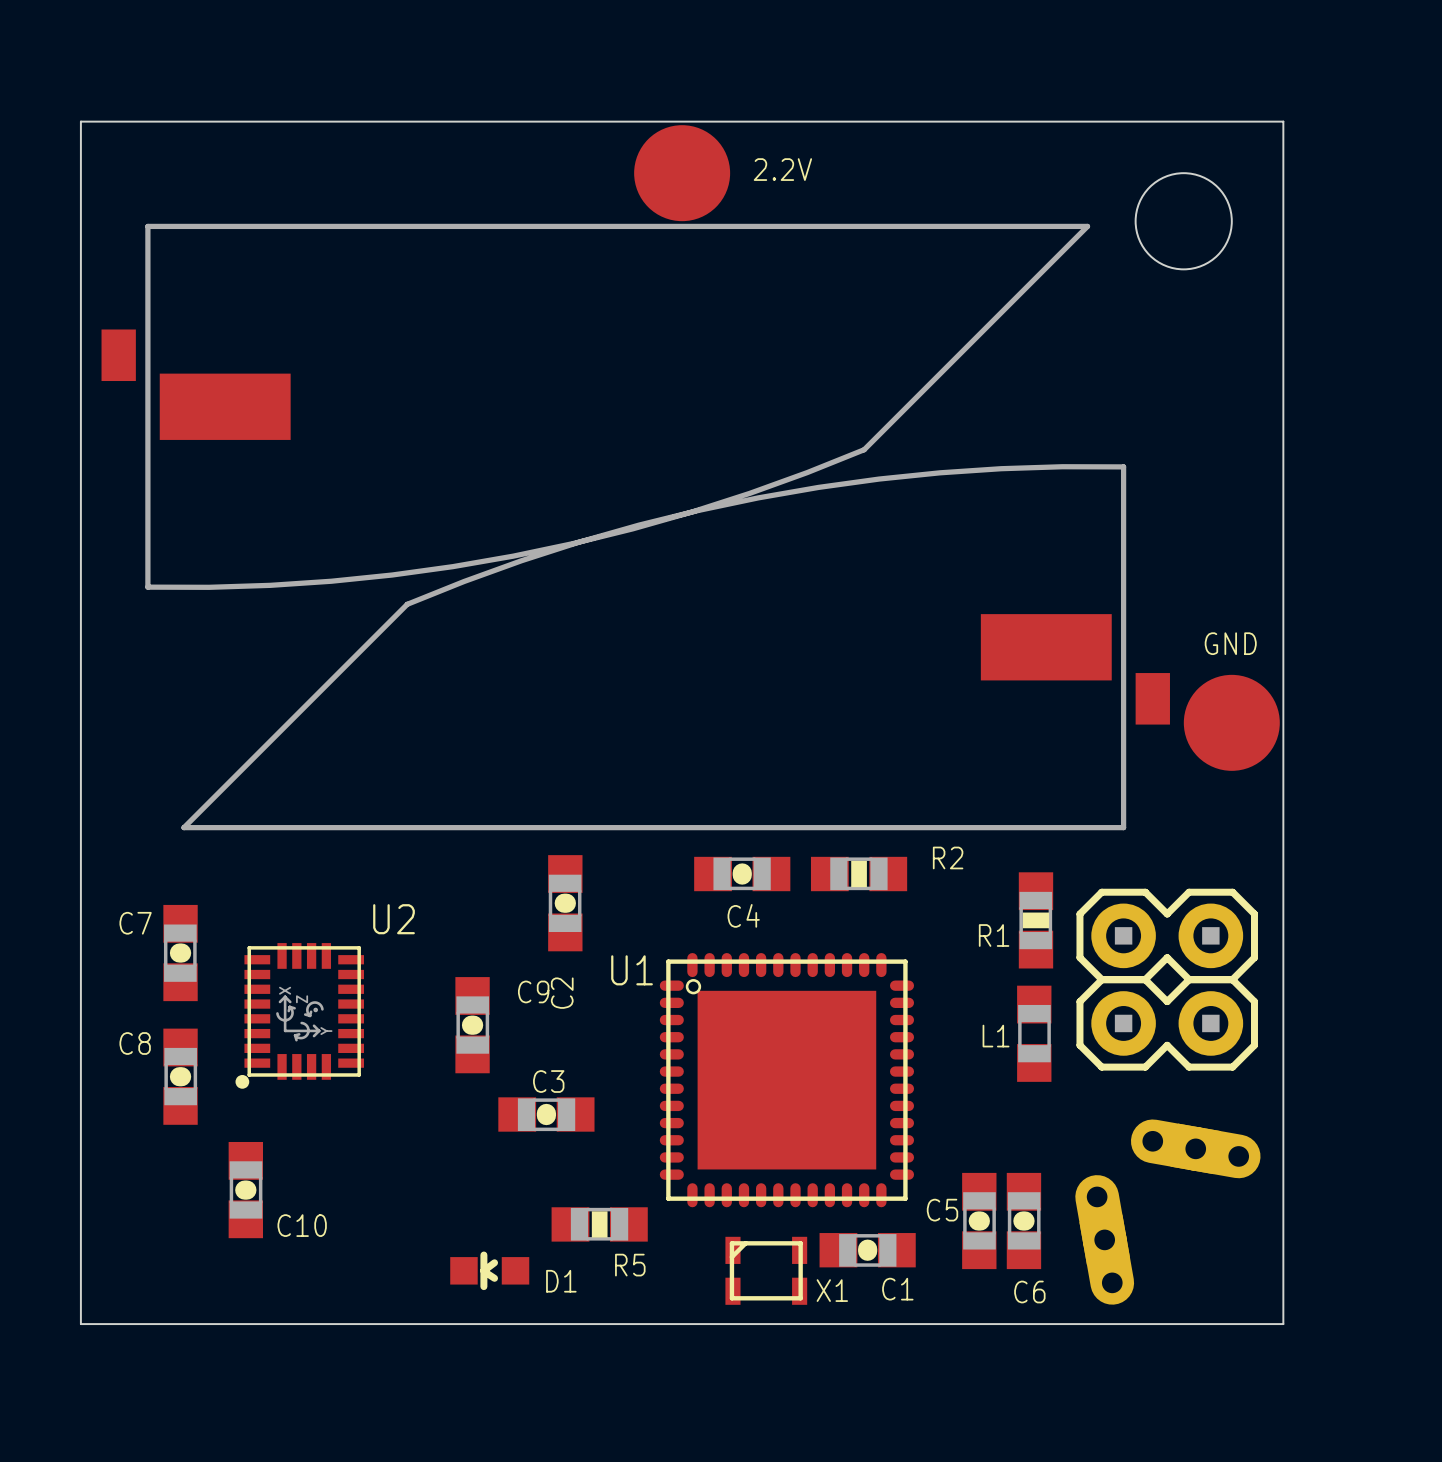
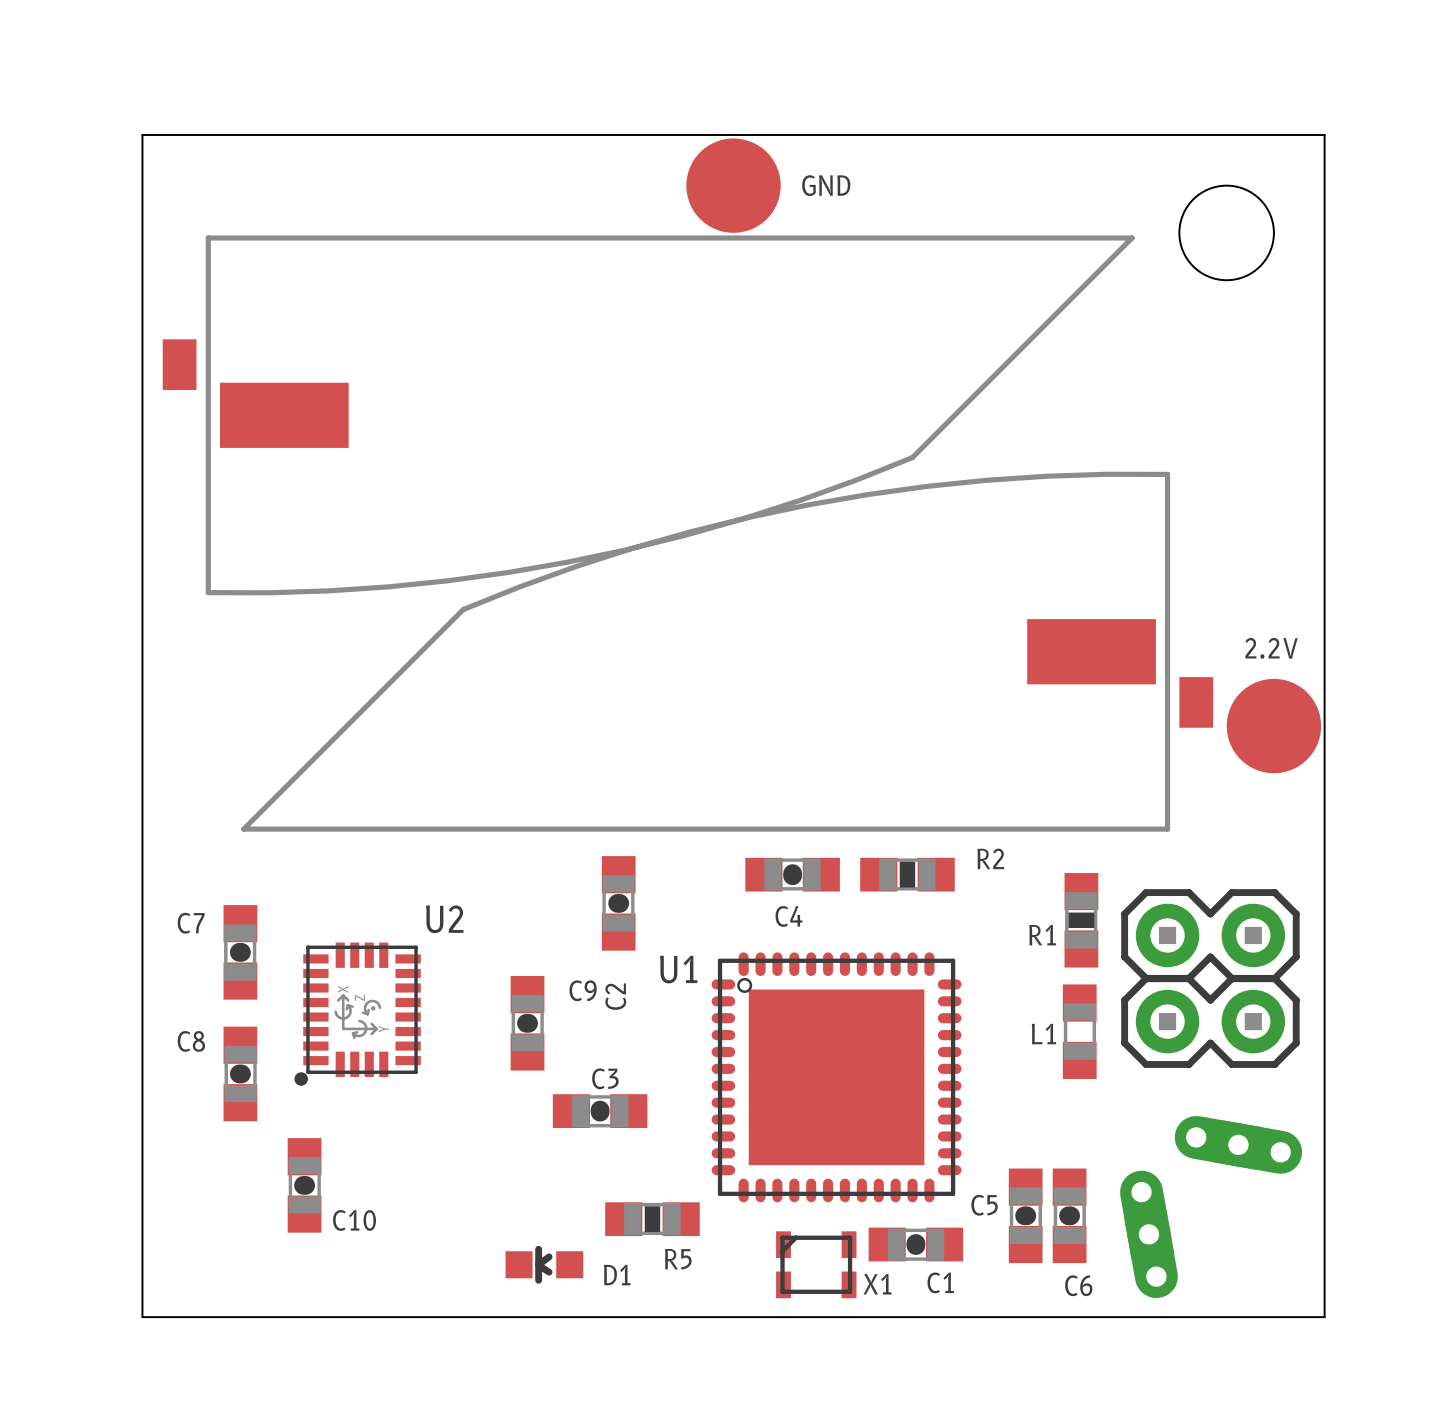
text: 2.2V (782, 169) -> GND (826, 185)
text: GND (1230, 643) -> 2.2V (1271, 648)

